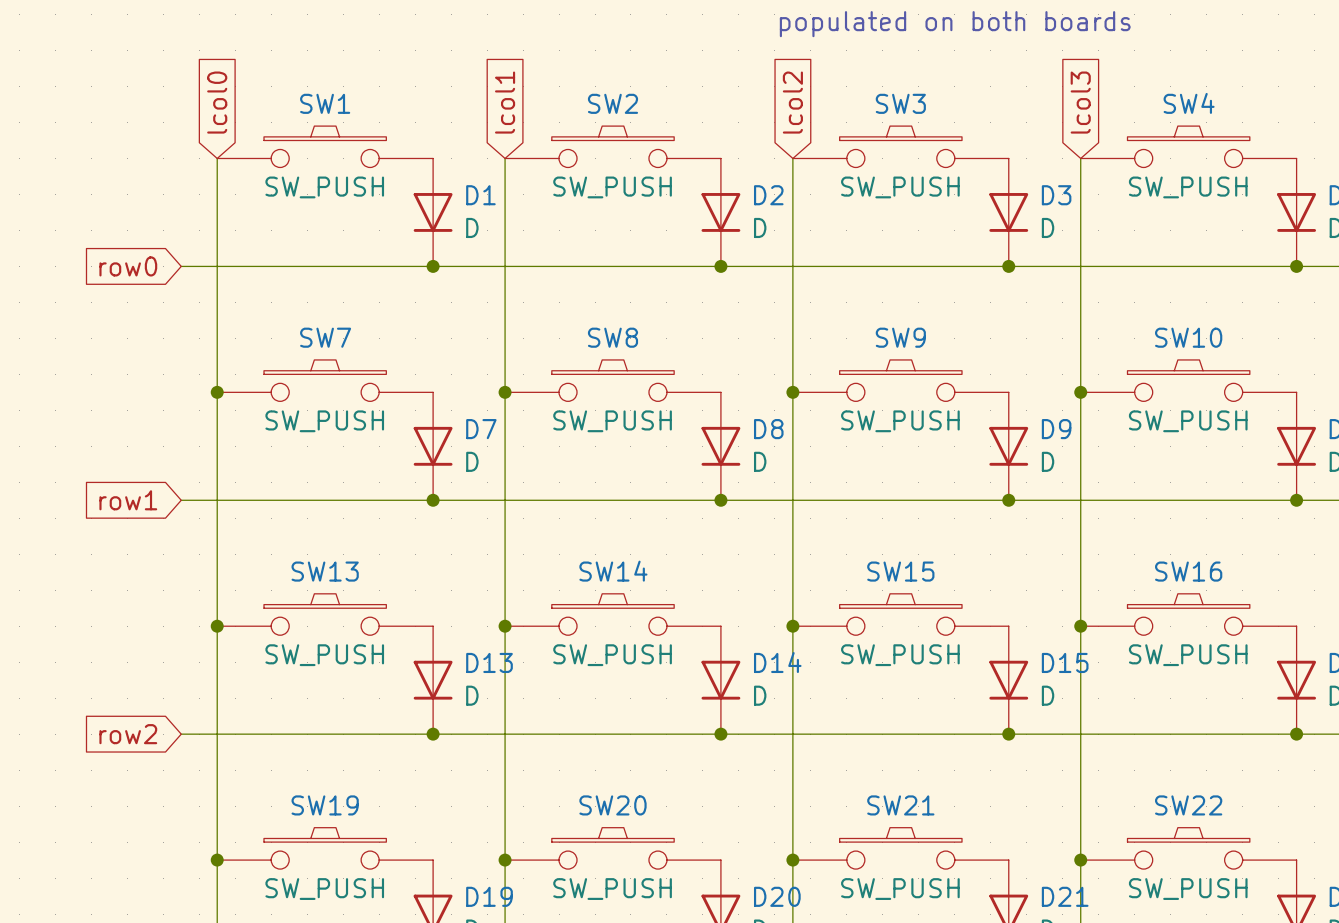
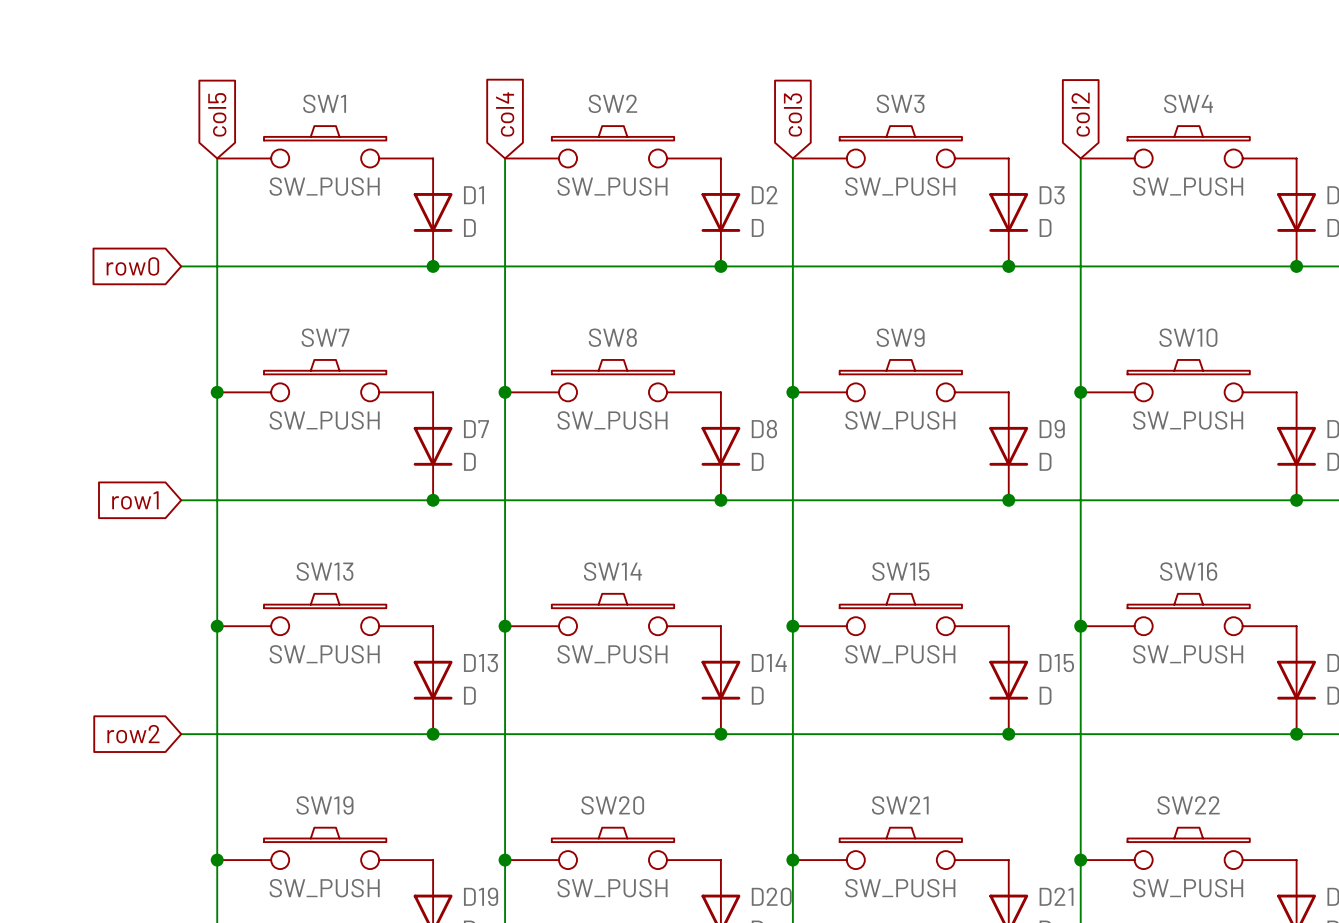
text: populated on both boards (955, 24) -> none
global label: lcol0 (217, 102) -> col5 (217, 114)
global label: lcol1 (505, 102) -> col4 (505, 114)
global label: lcol2 (792, 102) -> col3 (792, 114)
global label: lcol3 (1080, 102) -> col2 (1080, 114)

